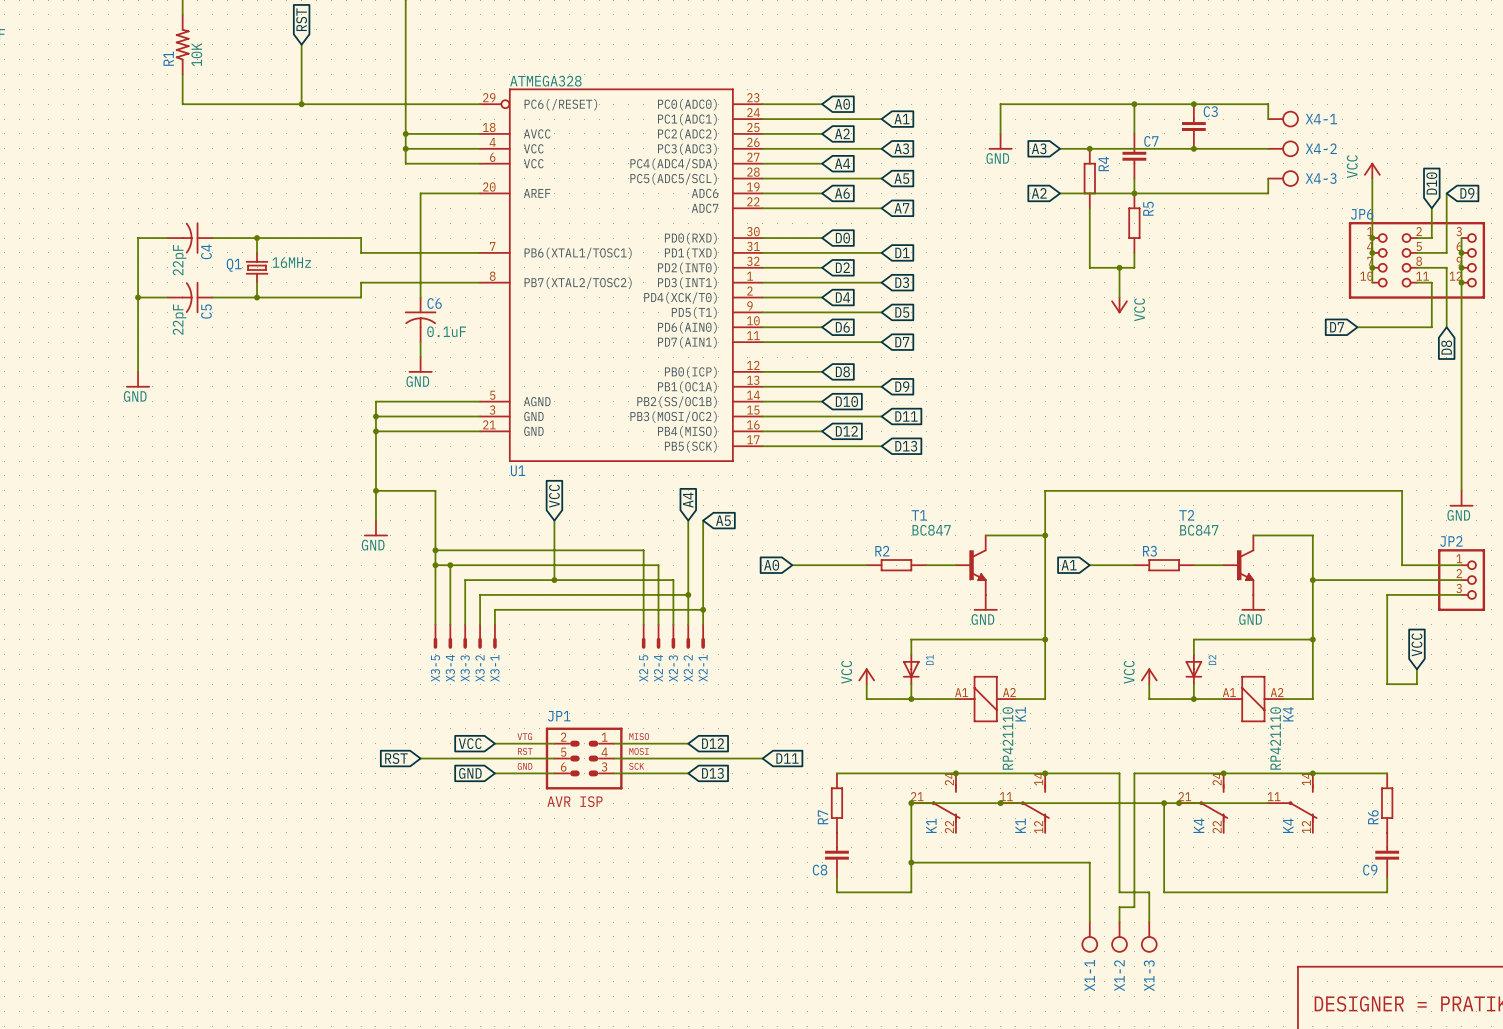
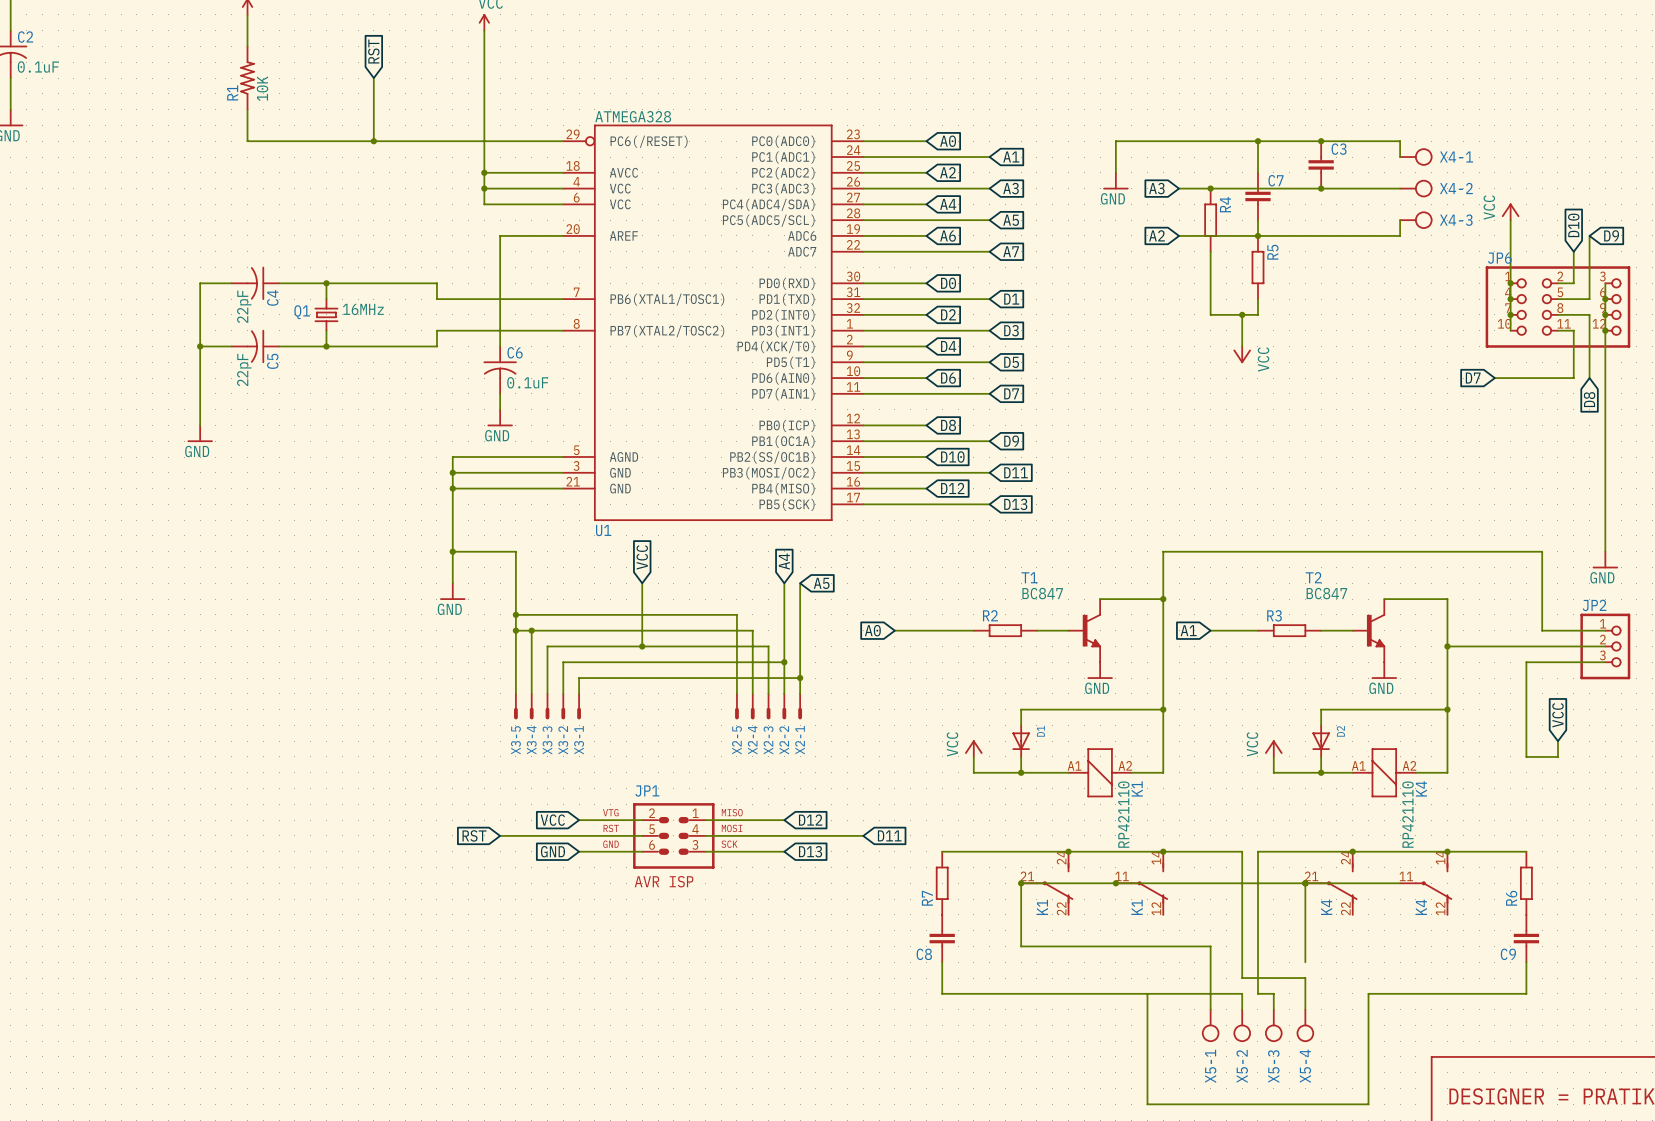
wire: (1164, 803) (1164, 892) -> none
junction: (1164, 803) -> none
wire: none -> (1305, 883) (1305, 962)
wire: (911, 862) (911, 892) (836, 892) -> (1242, 993) (942, 993) (942, 978)
junction: (911, 862) -> none
wire: (1149, 892) (1149, 907) -> (1273, 978) (1289, 978)
wire: (1179, 892) (1387, 892) -> (1147, 993) (1147, 1104) (1368, 1104) (1368, 993) (1526, 993) (1526, 978)
wire: none -> (1305, 978) (1305, 1009)
wire: (1119, 907) (1134, 907) -> (1273, 993) (1257, 993)
X5-4: none -> (1305, 1025)
X1-1 name: X1-1 (1089, 975) -> X5-1 (1210, 1066)
X1-2 name: X1-2 (1119, 975) -> X5-2 (1242, 1066)
X1-3 name: X1-3 (1149, 975) -> X5-3 (1273, 1066)

